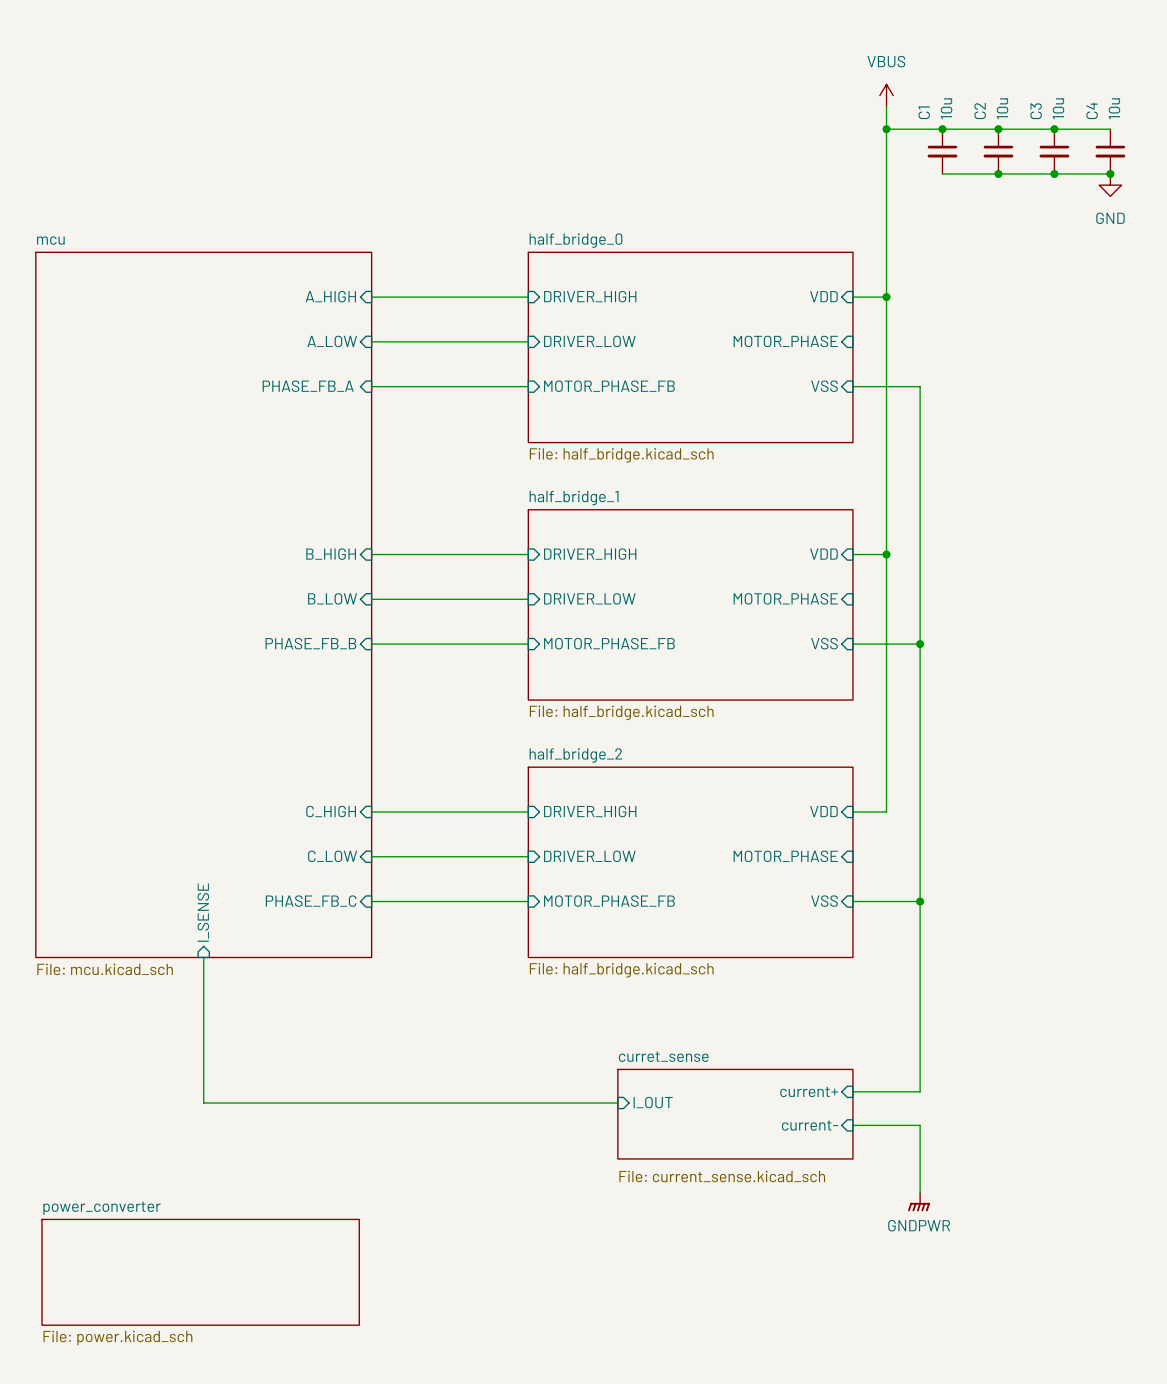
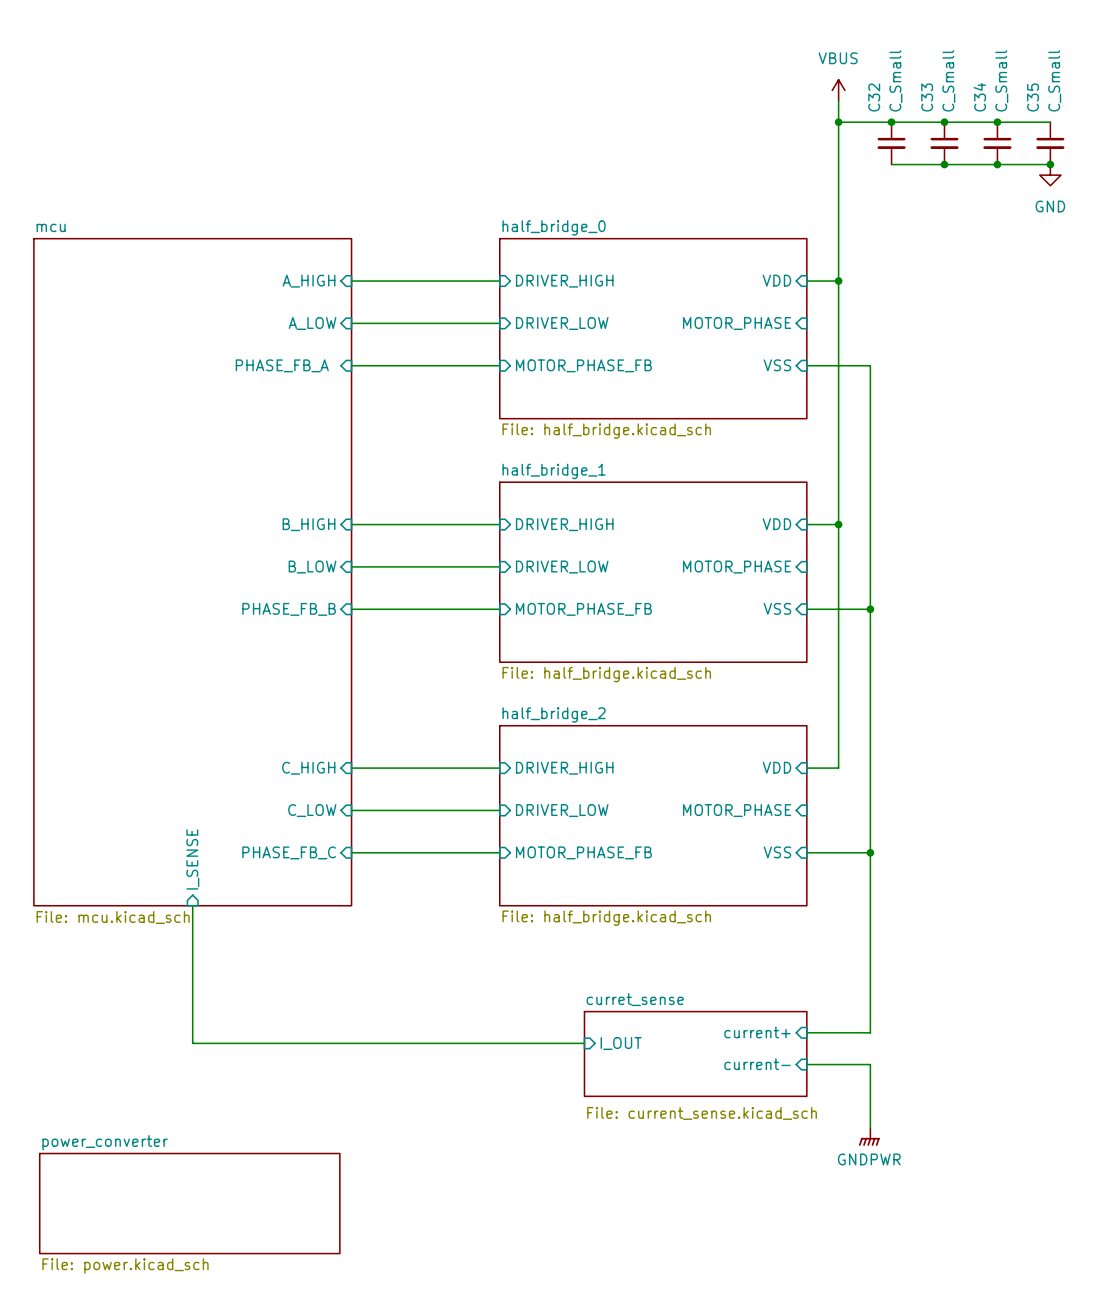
C1 value: 10u (946, 108) -> C_Small (895, 80)
C2 value: 10u (1002, 108) -> C_Small (948, 80)
C3 value: 10u (1058, 108) -> C_Small (1001, 80)
C4 value: 10u (1114, 108) -> C_Small (1054, 80)
C2 name: C2 (980, 110) -> C33 (927, 97)
C4 name: C4 (1092, 110) -> C35 (1033, 97)
C3 name: C3 (1036, 111) -> C34 (979, 97)
C1 name: C1 (924, 112) -> C32 (874, 97)

